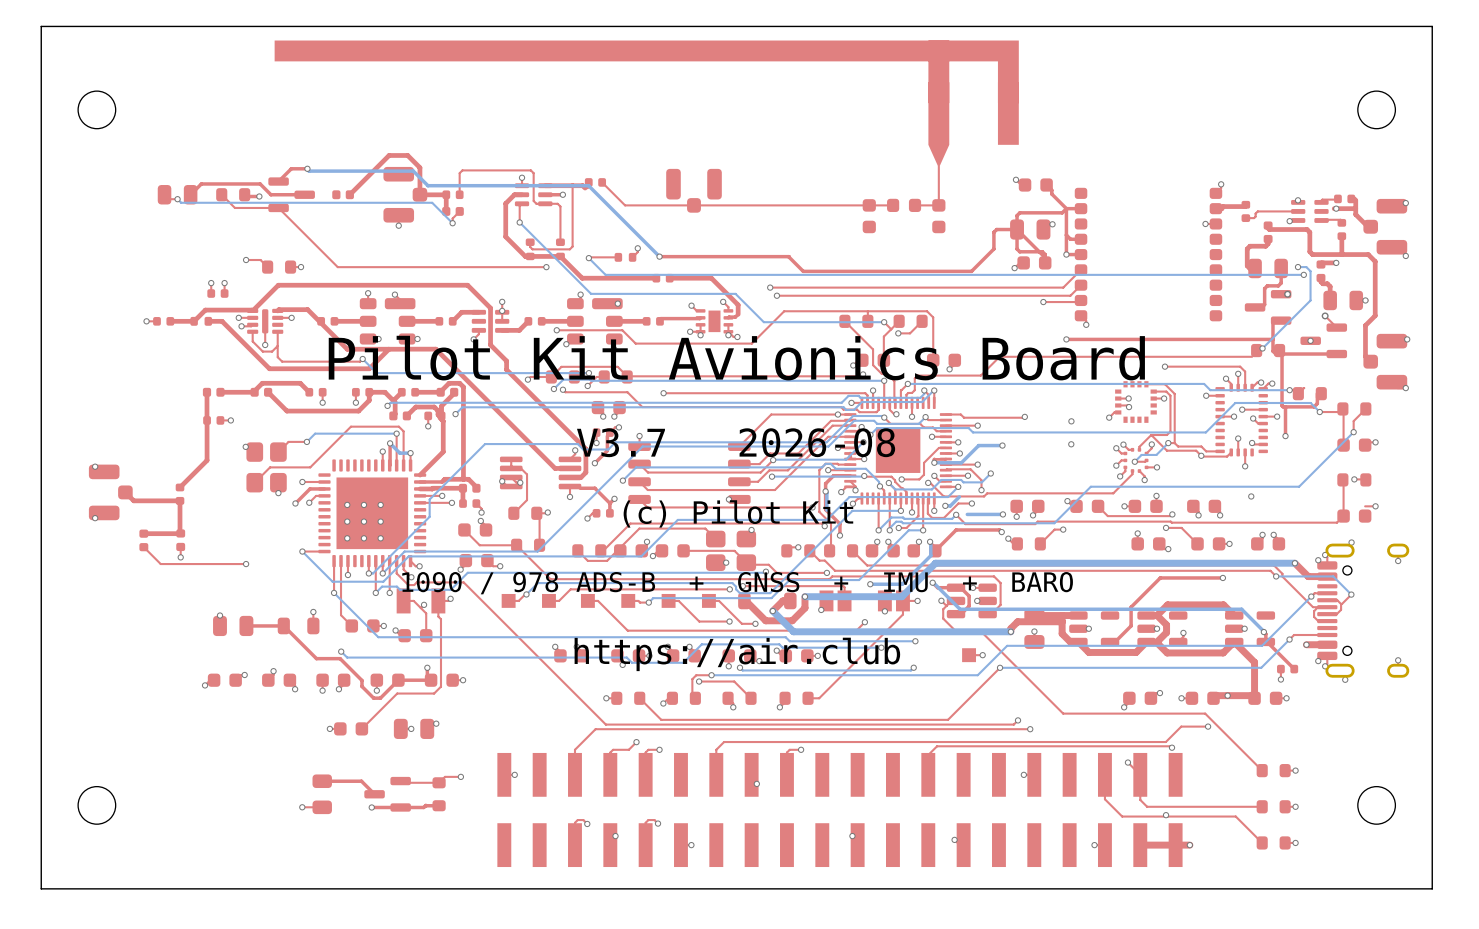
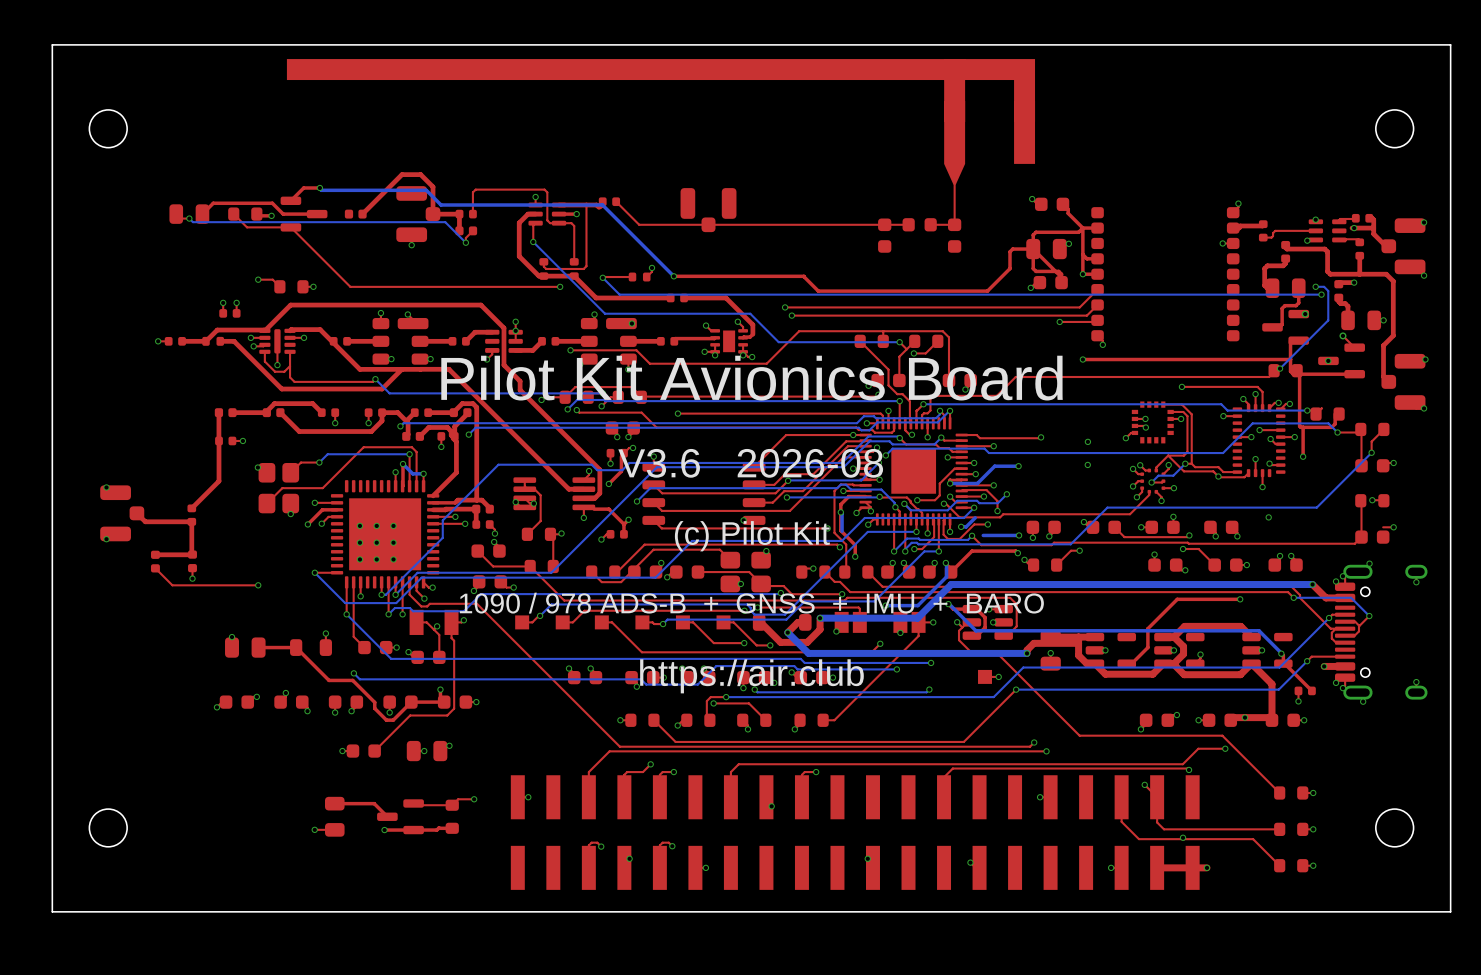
text: V3.7 2026-08 (736, 442) -> V3.6 2026-08 (750, 463)

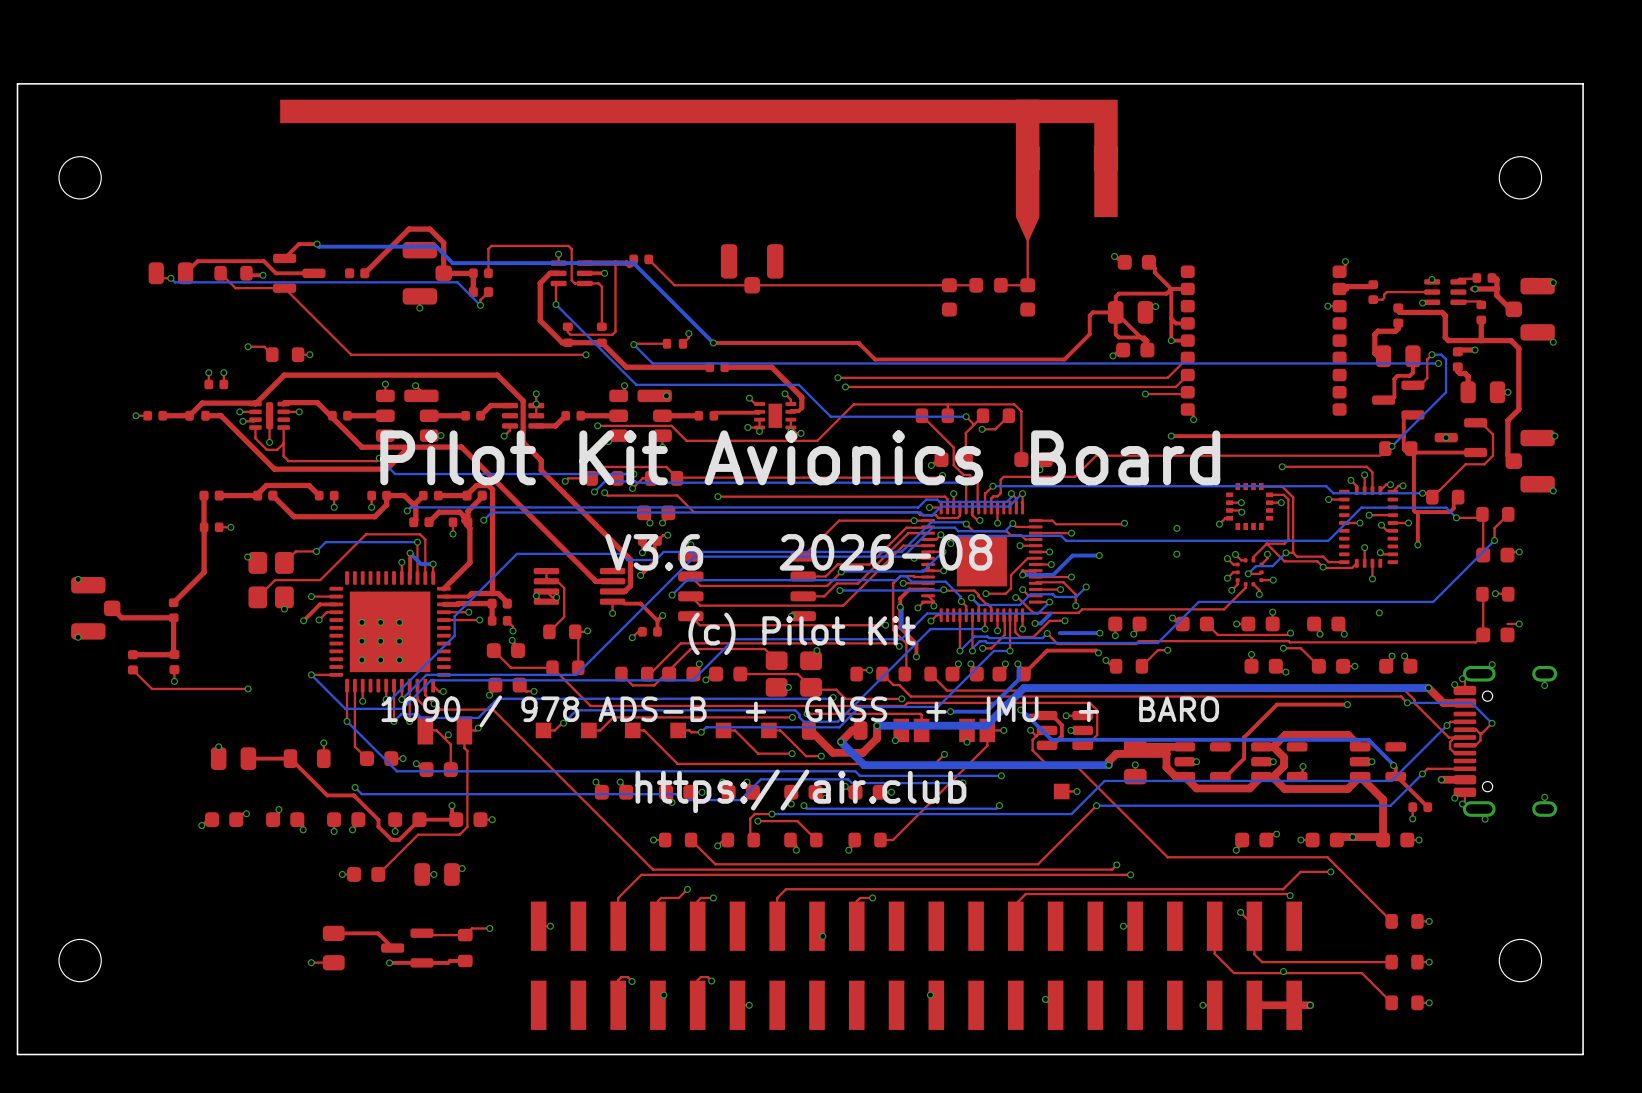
top track: none -> (1431, 354) (1427, 359) (1427, 378) (1420, 385)
via: (1305, 314) -> none
top track: (1342, 335) (1354, 347) -> (1439, 490) (1465, 464) (1484, 464) (1493, 455) (1493, 434) (1481, 422) (1475, 422)
via: (1342, 335) -> none

